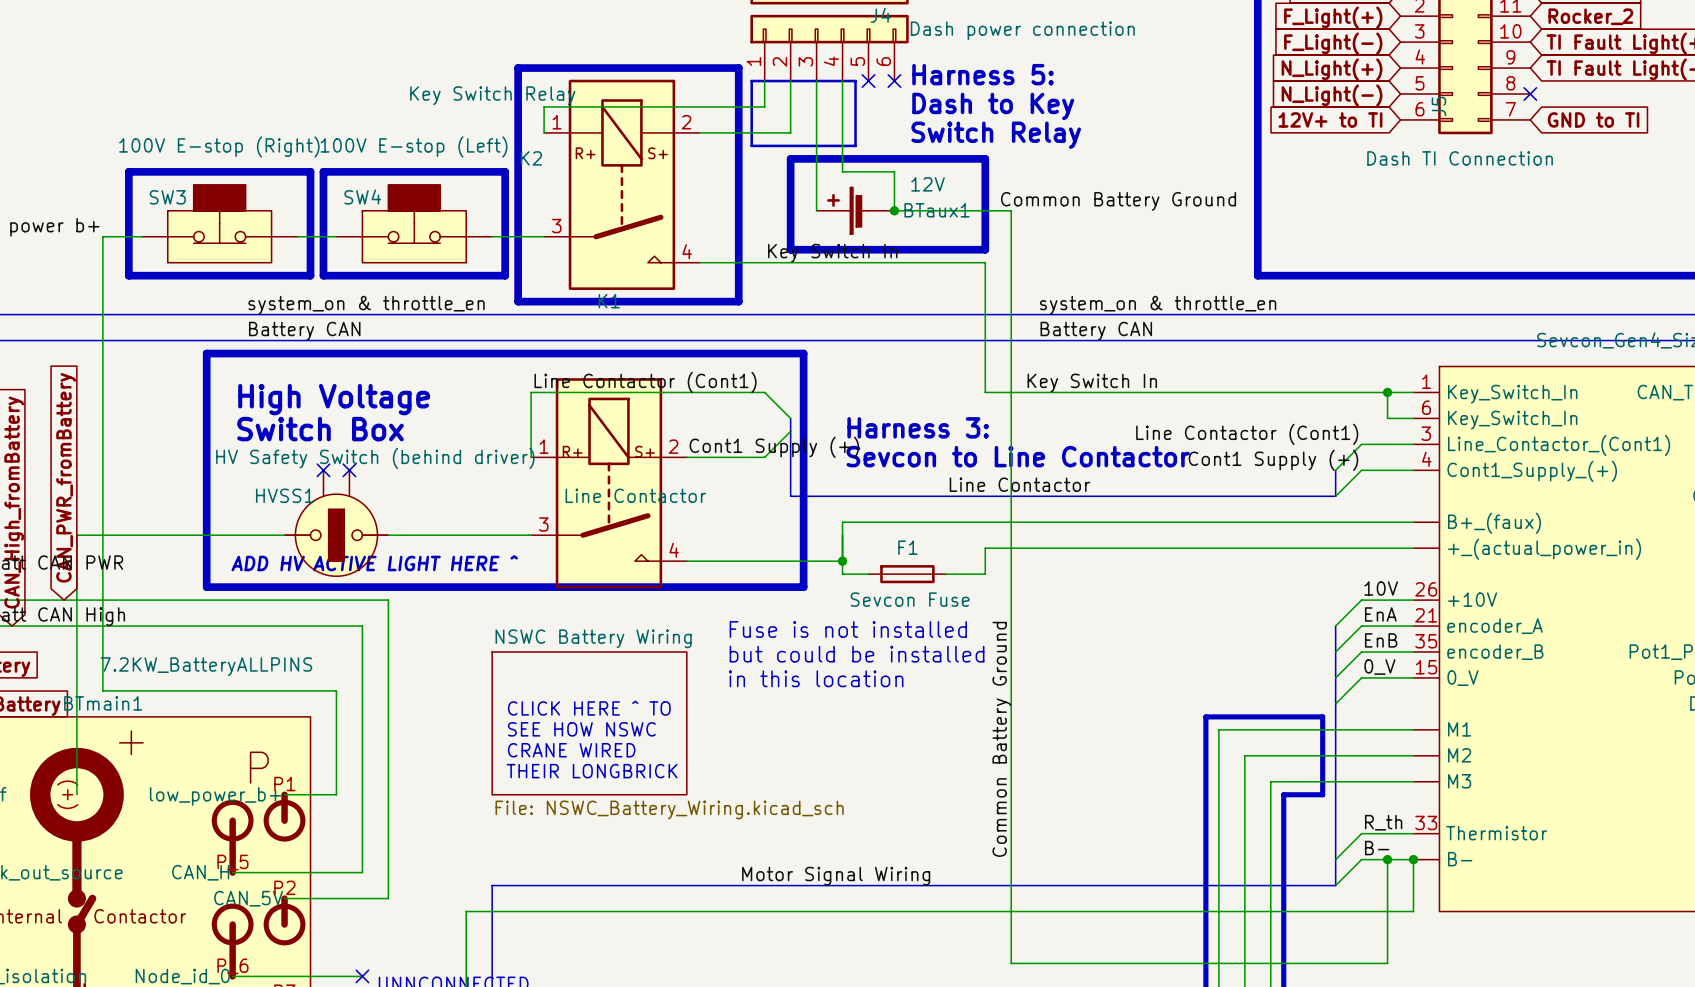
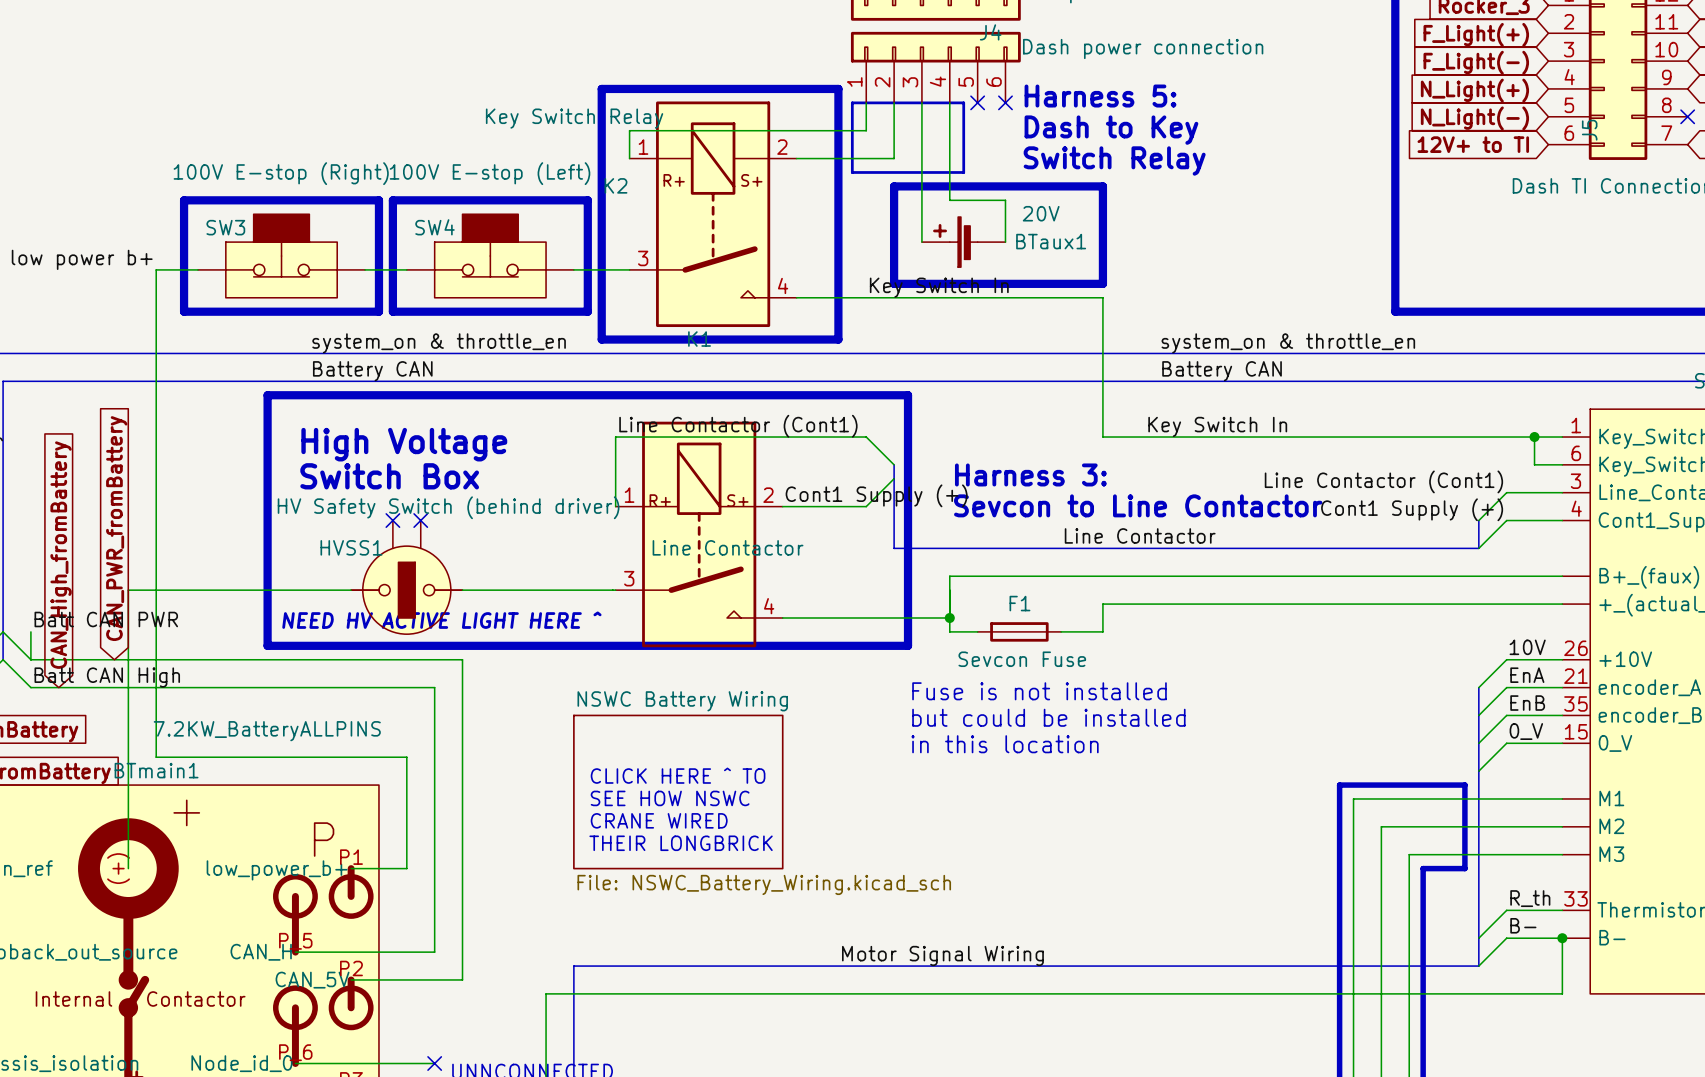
BTaux1 value: 12V (928, 184) -> 20V (1041, 213)
label: Common Battery Ground (1118, 201) -> none
wire: (894, 210) (1011, 210) (1011, 963) (1387, 963) (1387, 859) -> none
junction: (894, 210) -> none
text: ADD HV ACTIVE LIGHT HERE ^ (374, 563) -> NEED HV ACTIVE LIGHT HERE ^ (441, 620)
text position: Fuse is not installed (848, 629) -> Fuse is not installed (1039, 691)
text position: but could be installed (857, 654) -> but could be installed (1048, 717)
text position: in this location (816, 678) -> in this location (1005, 744)
label: Common Battery Ground (1001, 739) -> none
junction: (1387, 859) -> none

